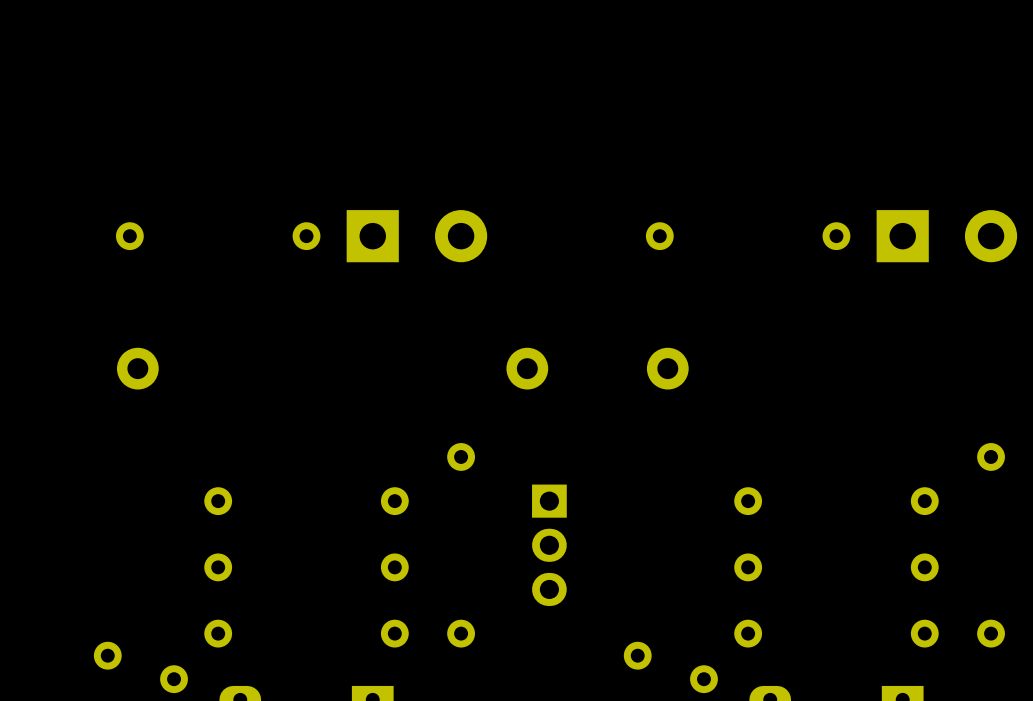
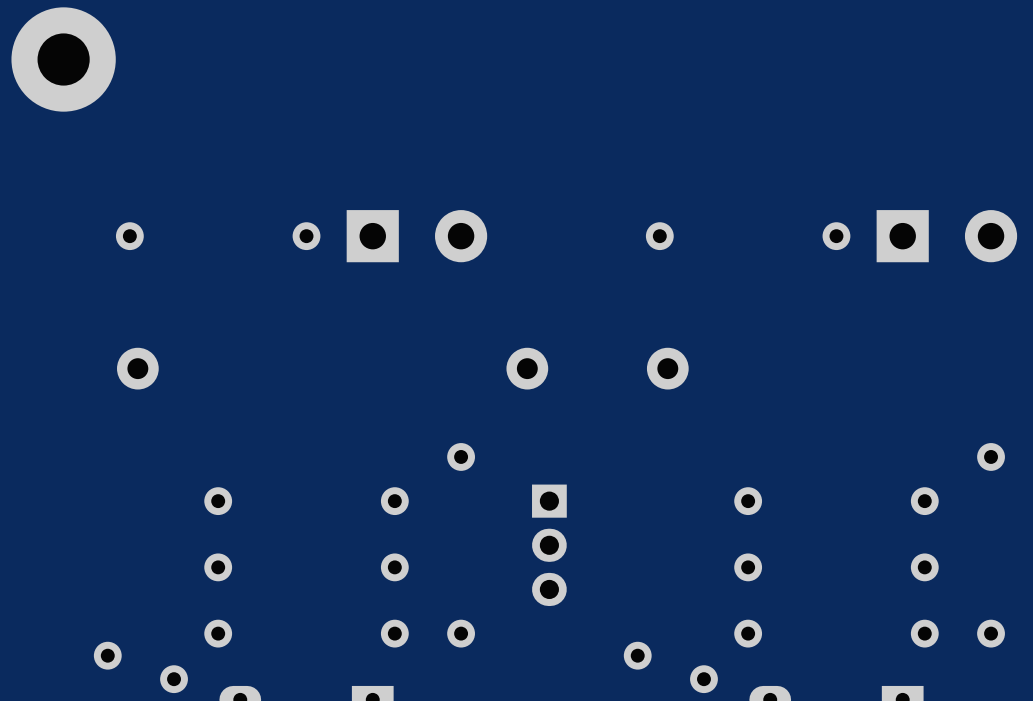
part: none -> (63, 59)

